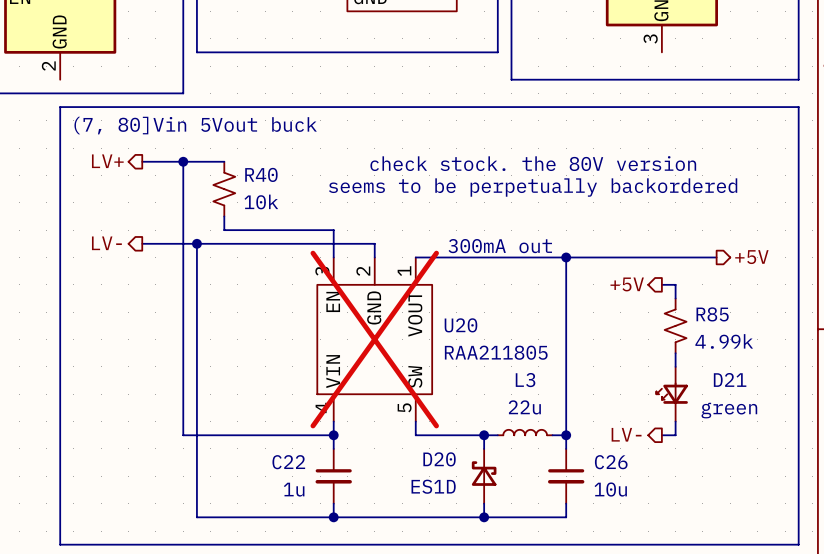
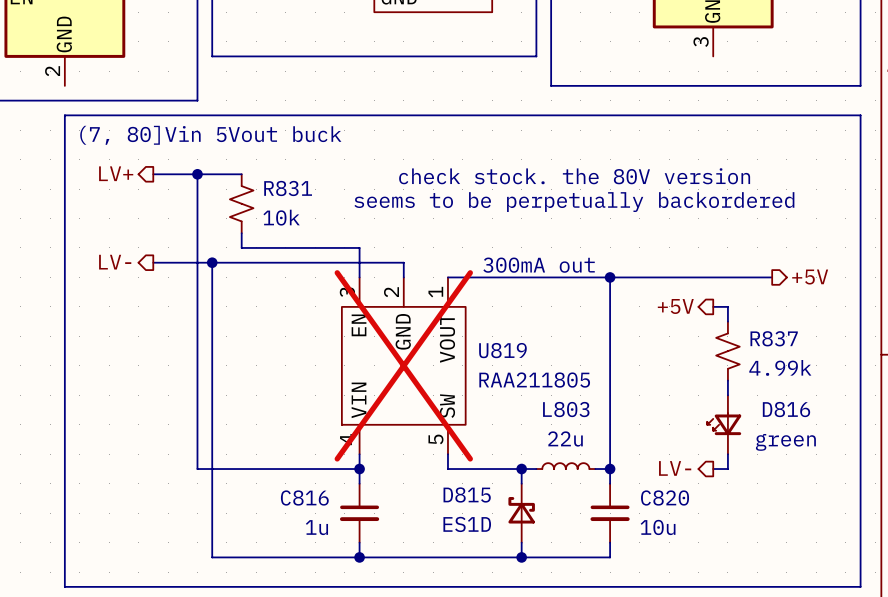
R40 name: R40 (261, 174) -> R831 (288, 188)
R85 name: R85 (712, 314) -> R837 (774, 338)
U20 name: U20 (460, 325) -> U819 (502, 350)
D21 name: D21 (730, 379) -> D816 (786, 409)
L3 name: L3 (525, 380) -> L803 (566, 409)
D20 name: D20 (439, 459) -> D815 (467, 494)
C22 name: C22 (288, 462) -> C816 (304, 498)
C26 name: C26 (611, 462) -> C820 (665, 498)

